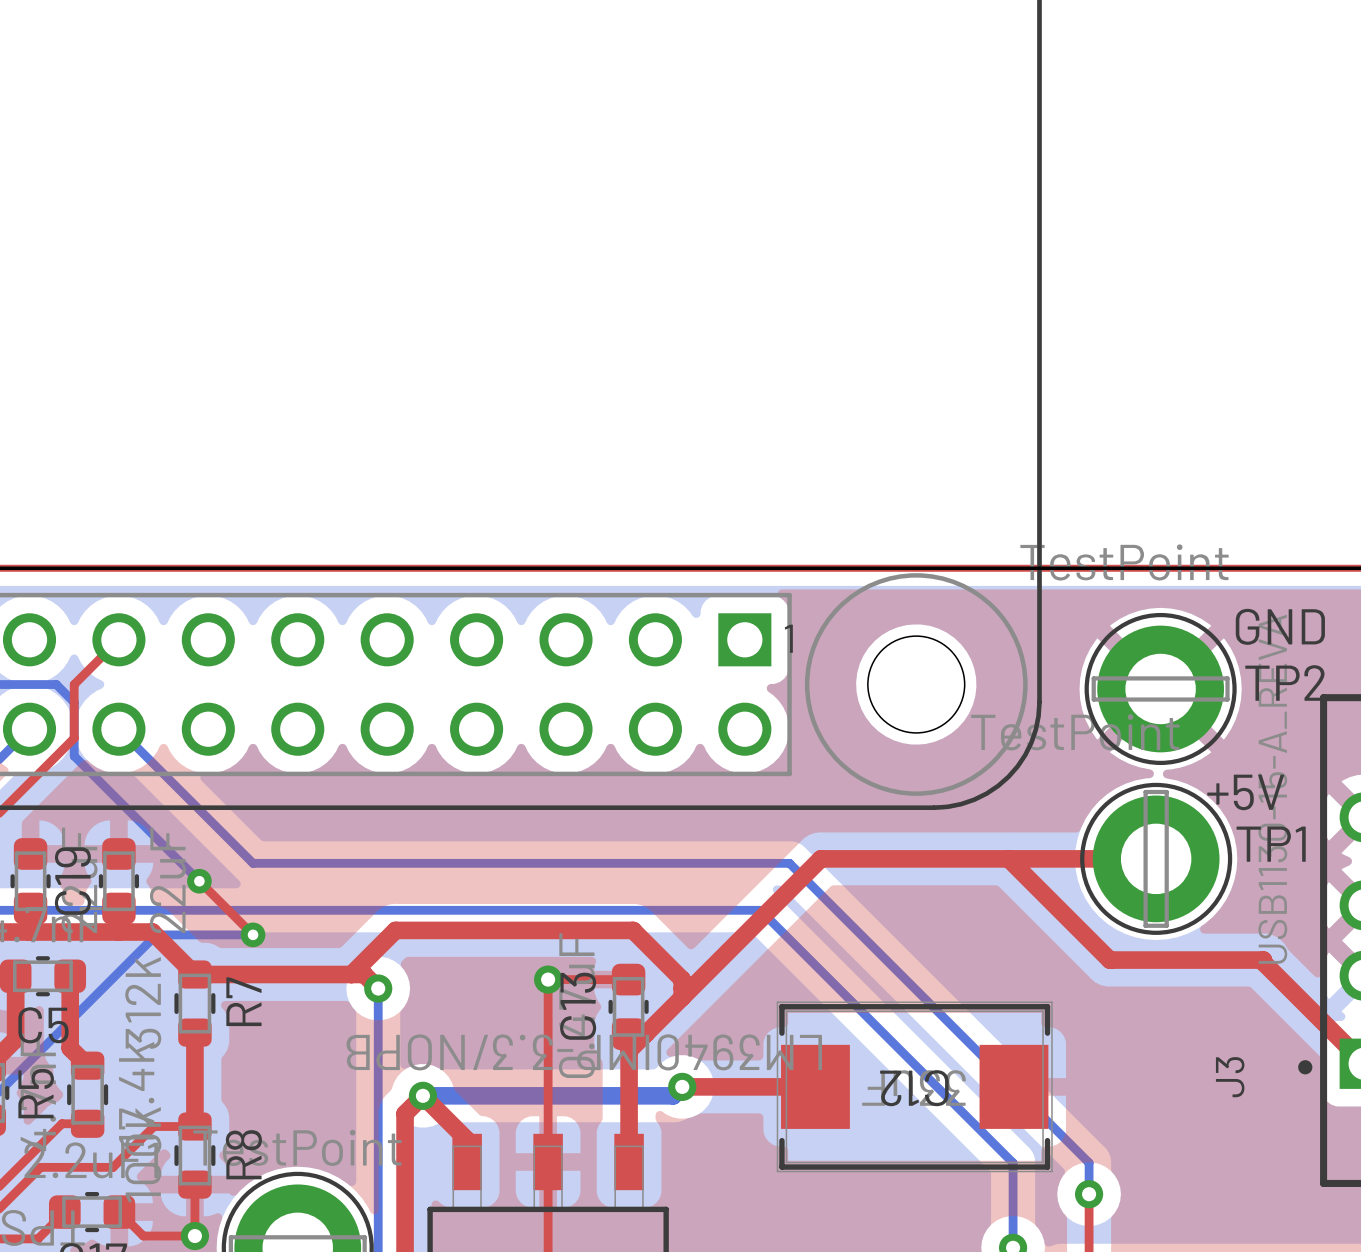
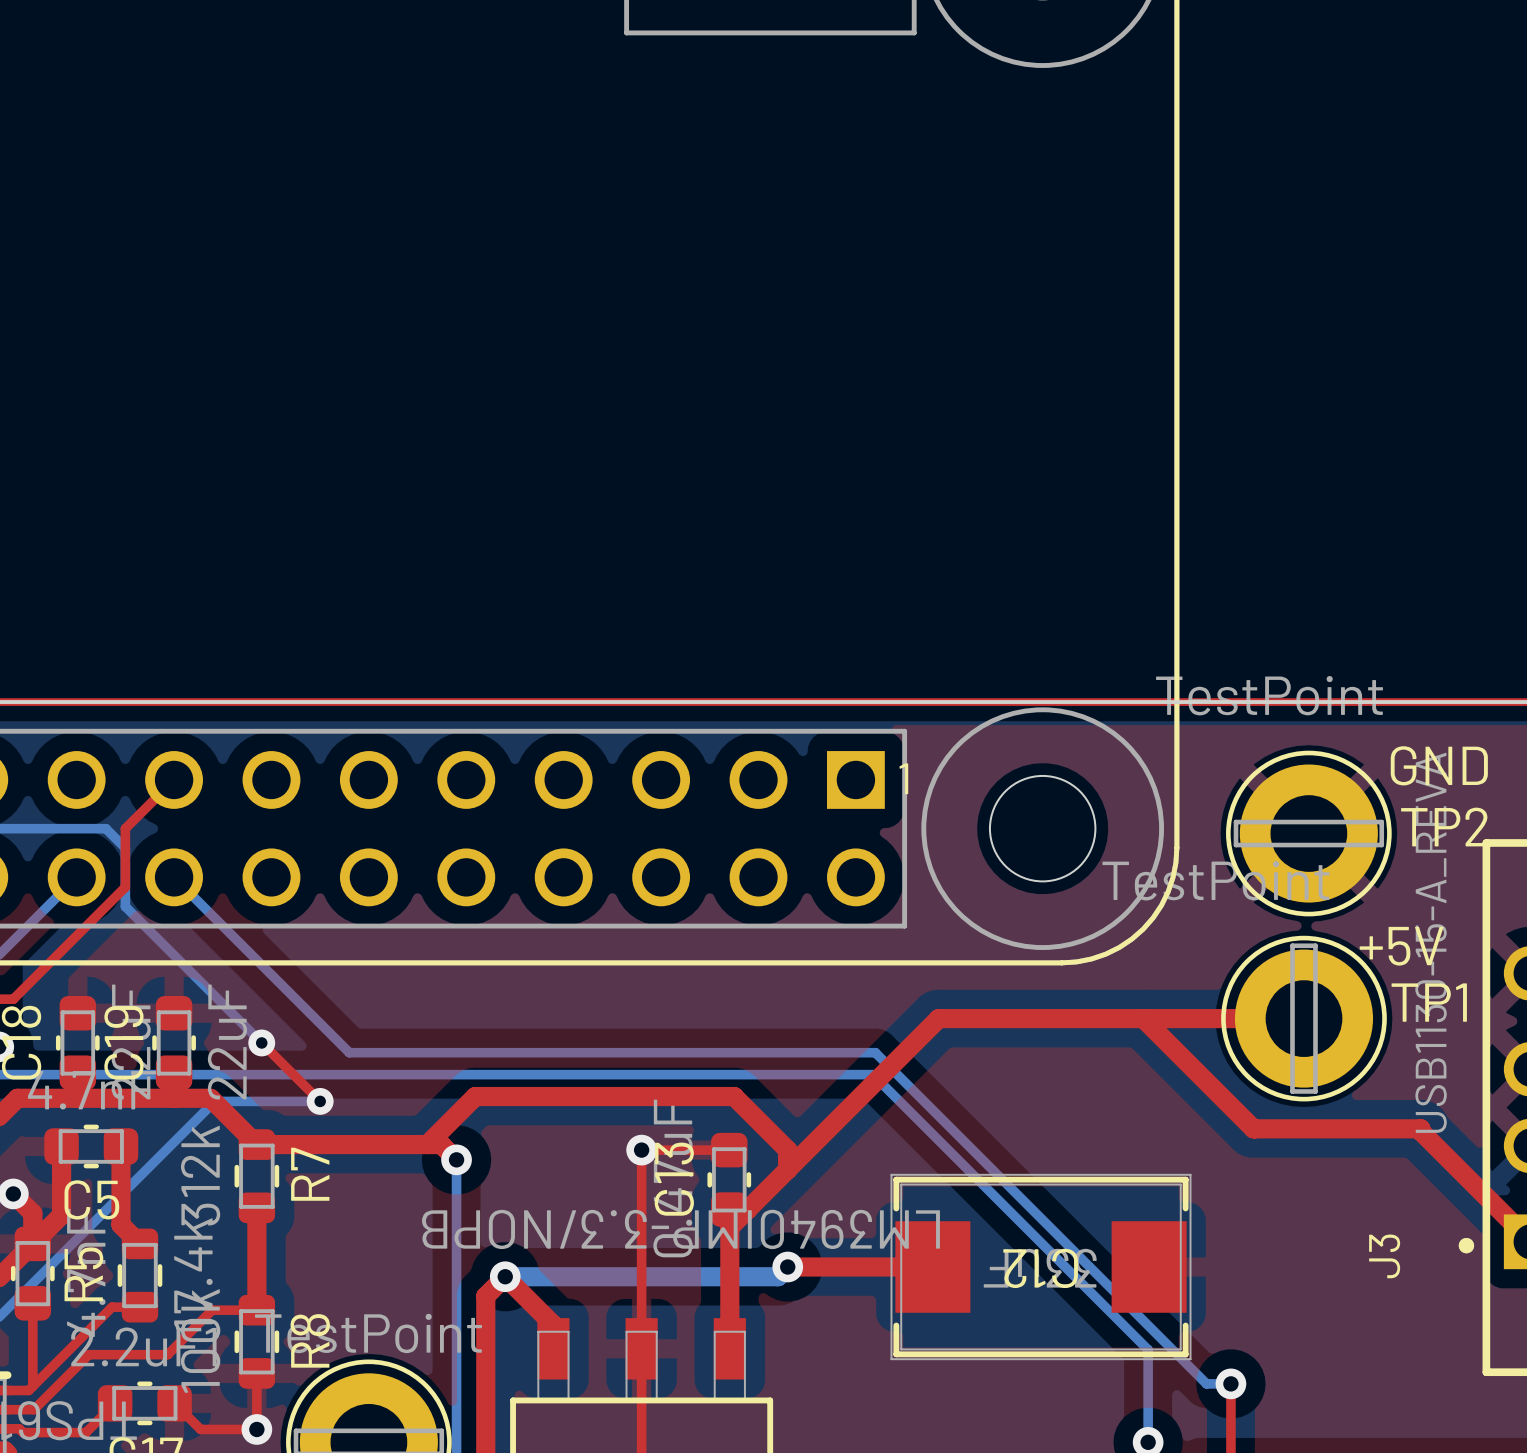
bottom track: (253, 863) (789, 863) (1089, 1162) (1089, 1194) -> (320, 1023) (349, 1052) (875, 1052) (1206, 1383) (1230, 1383)

